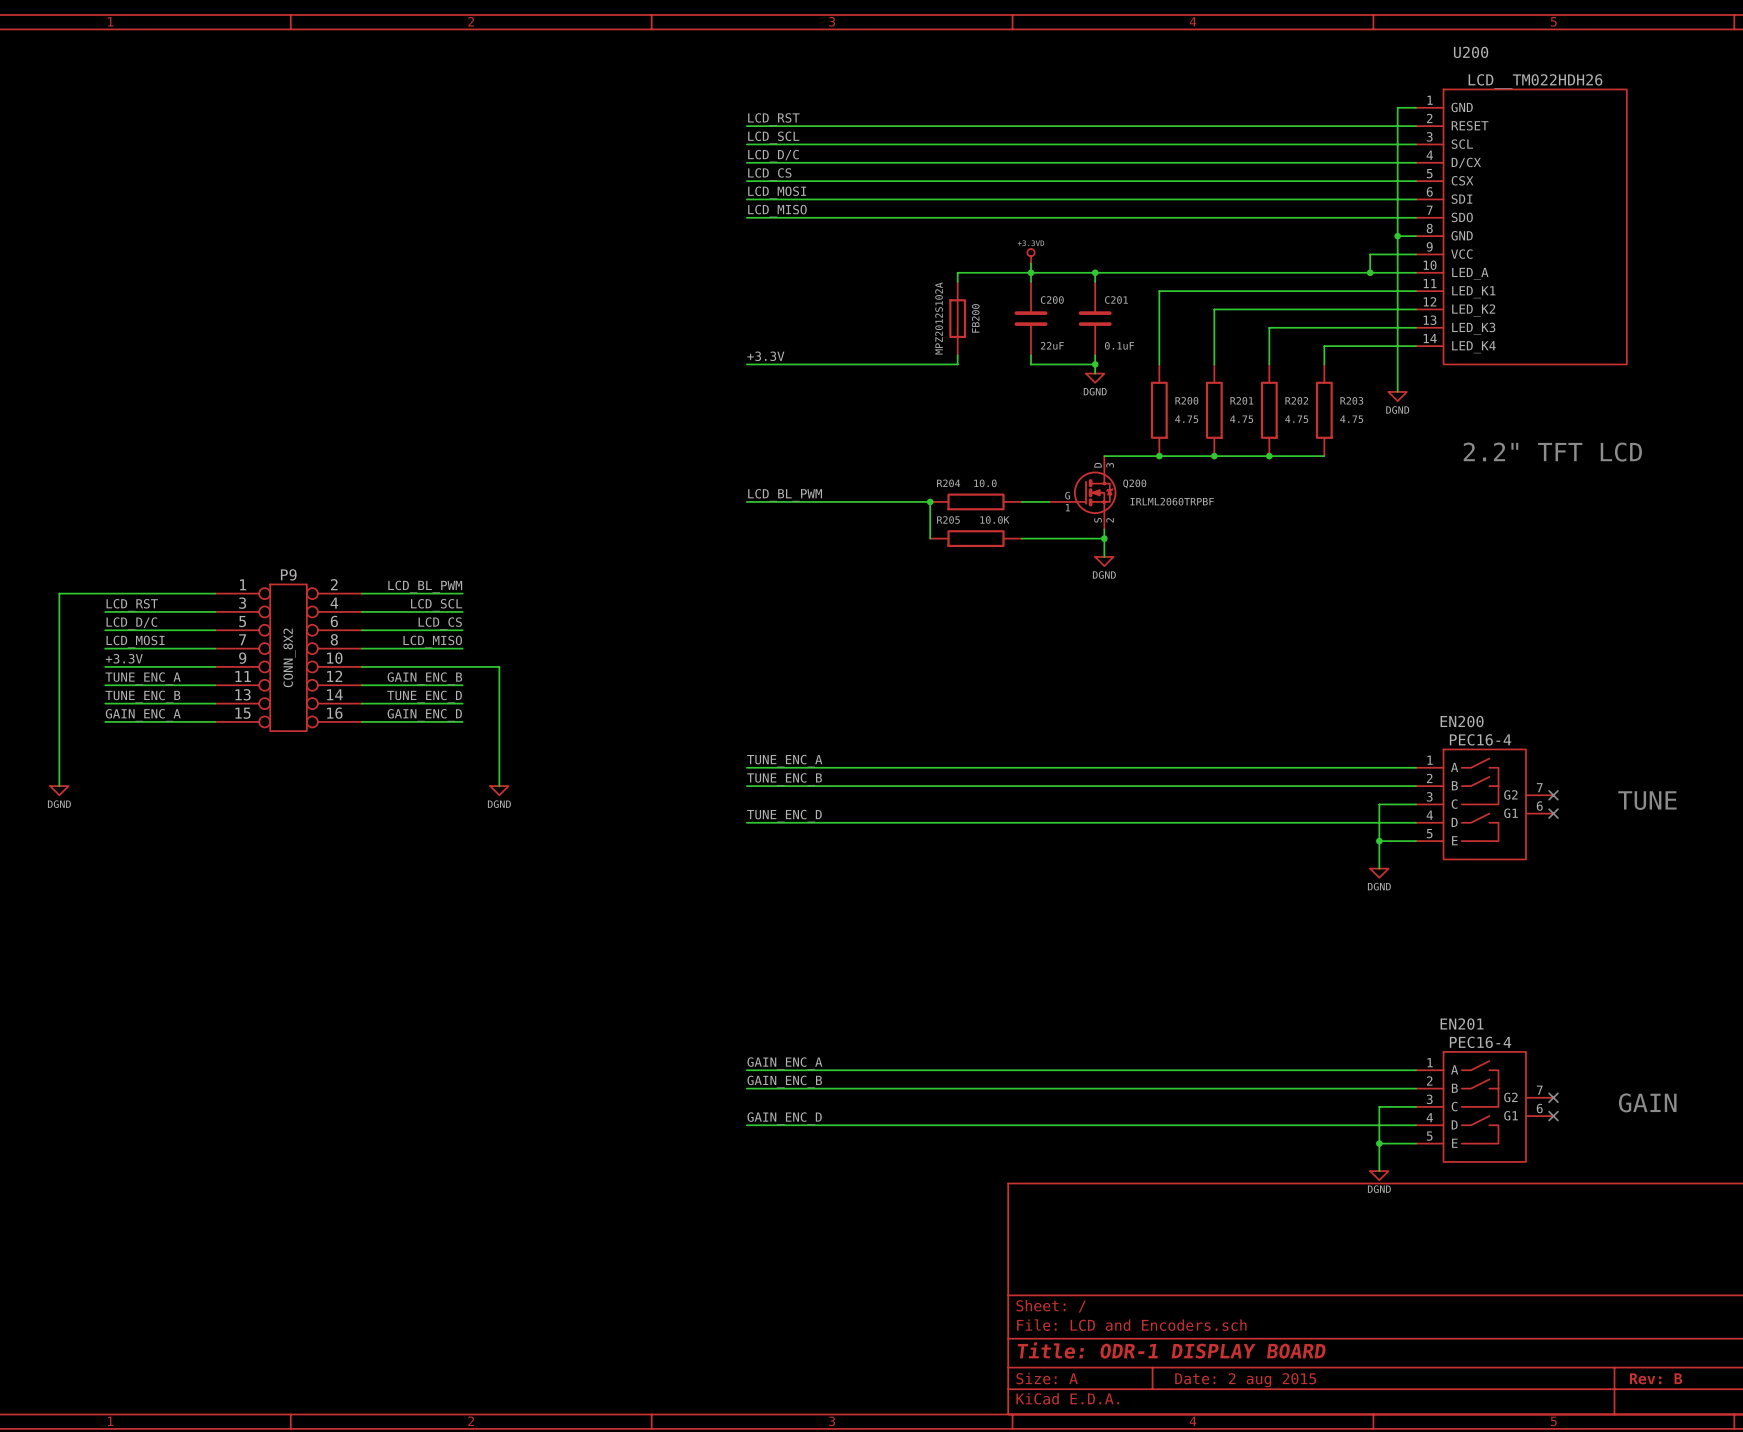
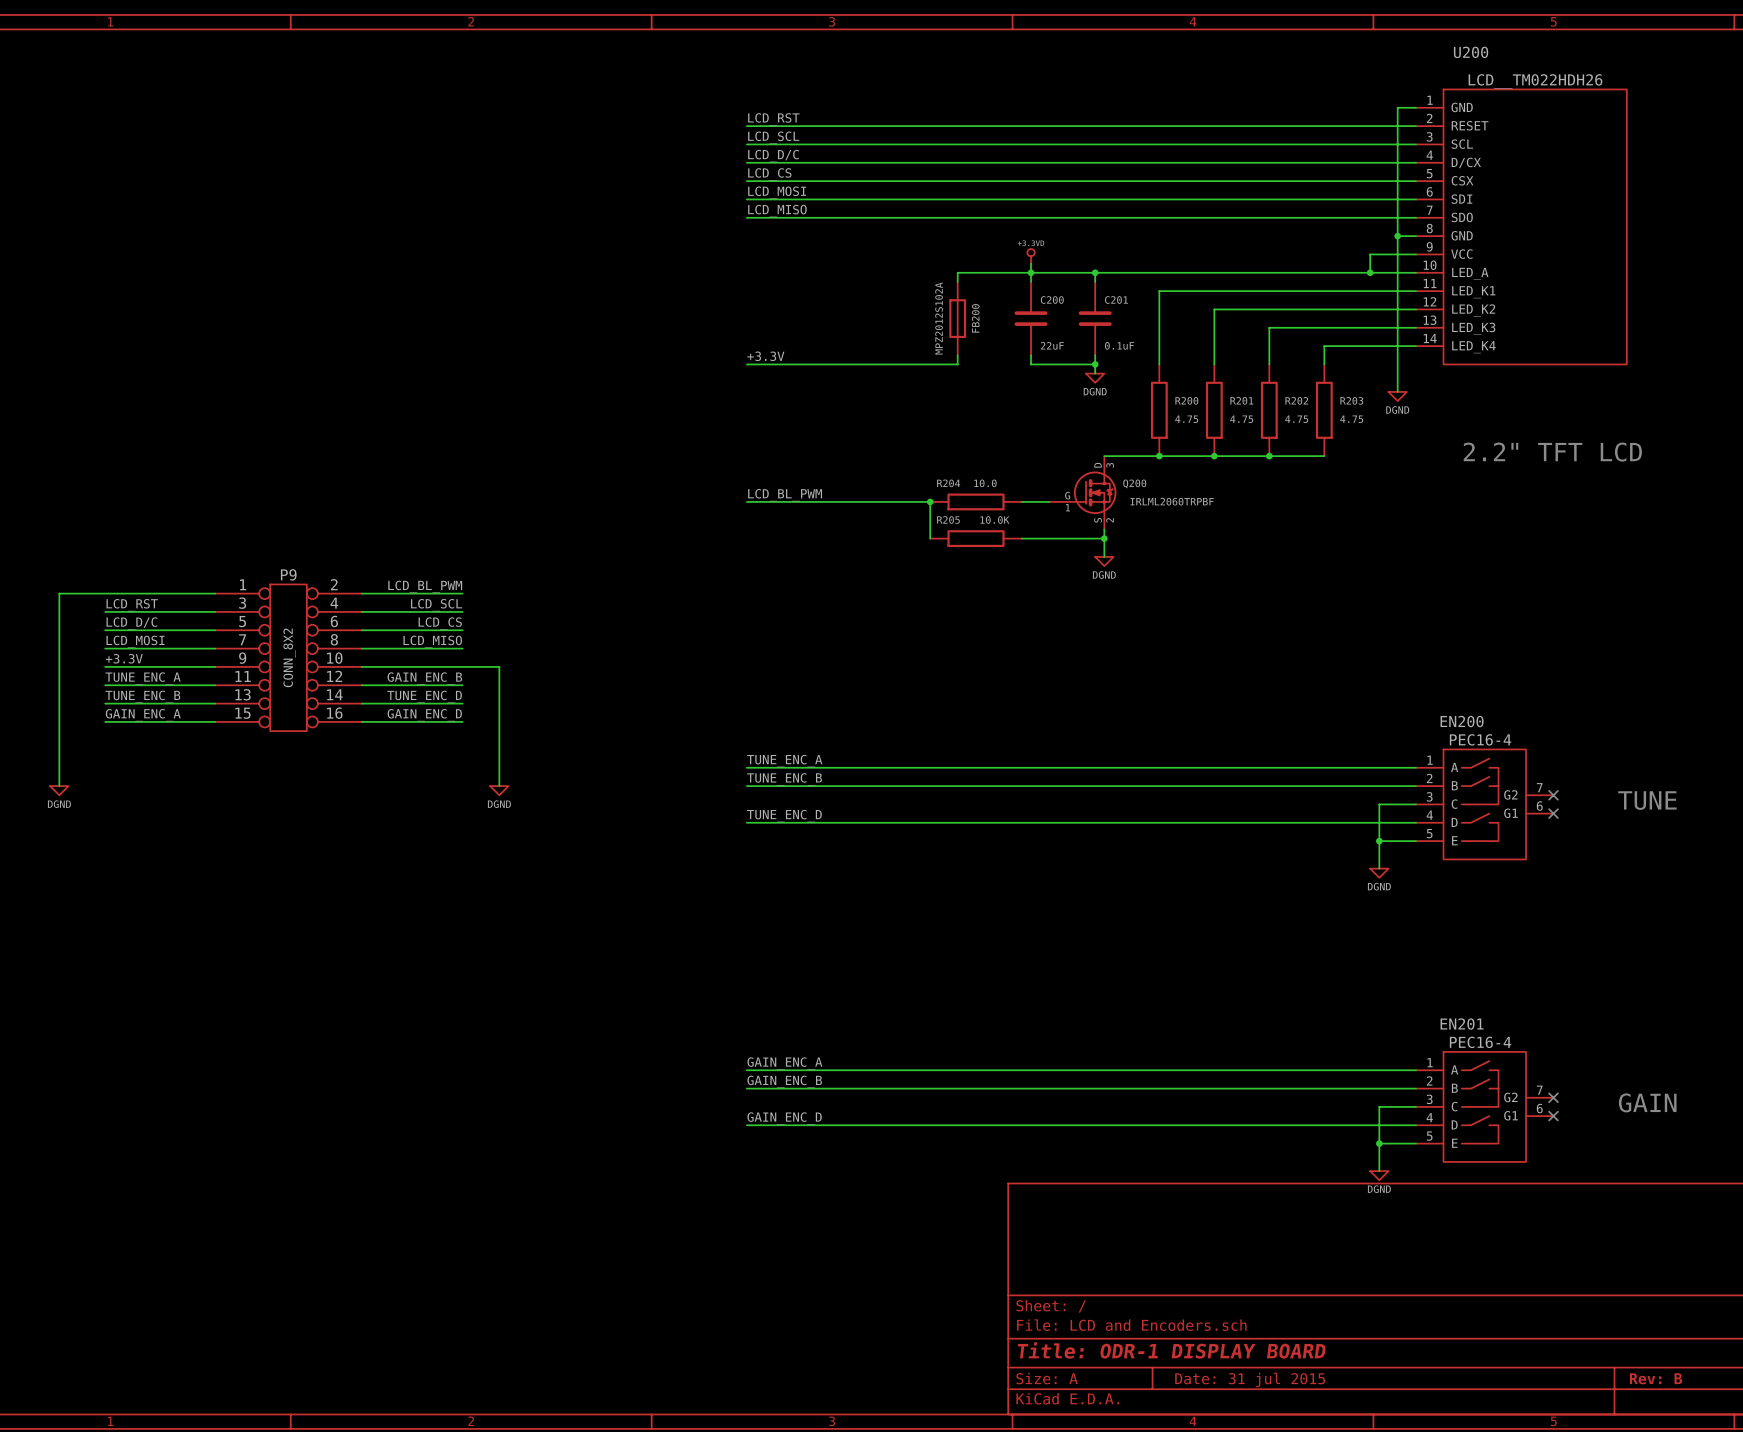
title block: Date: 2 aug 2015 (1245, 1380) -> Date: 31 jul 2015 (1250, 1379)

